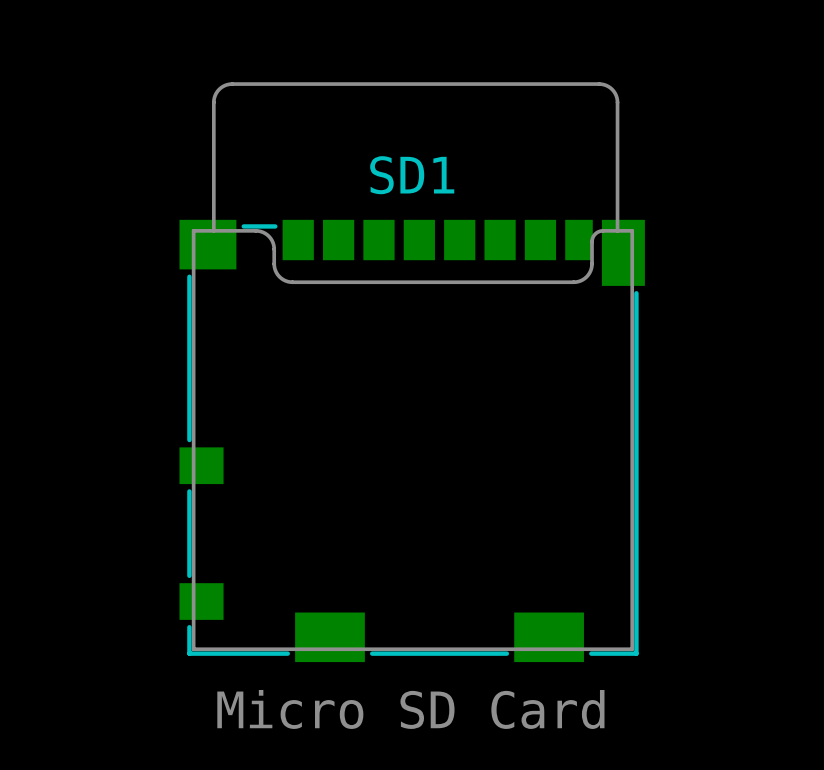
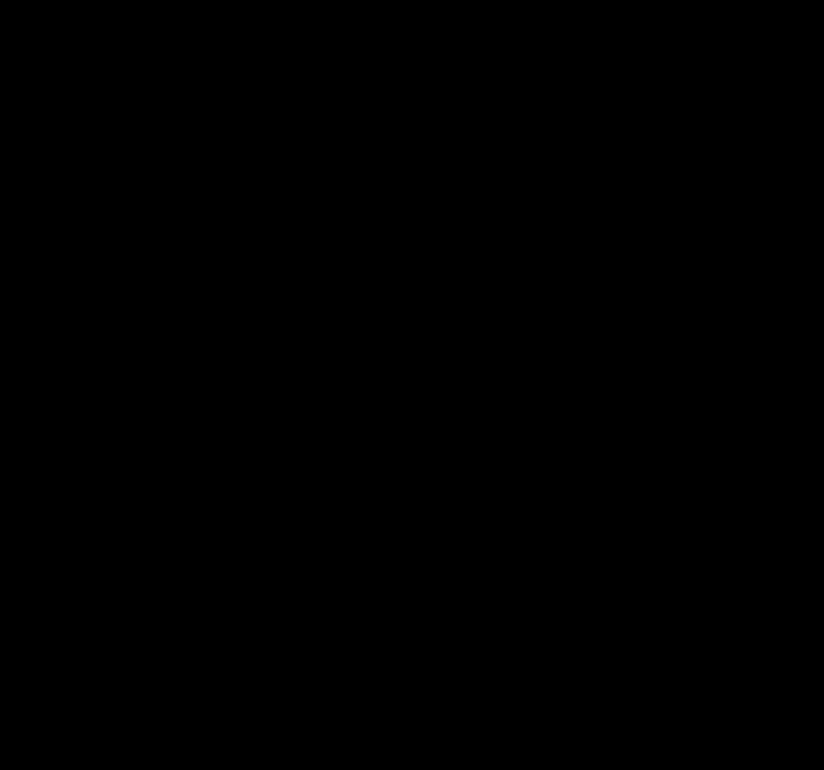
SD1: Micro SD Card (412, 372) -> none

